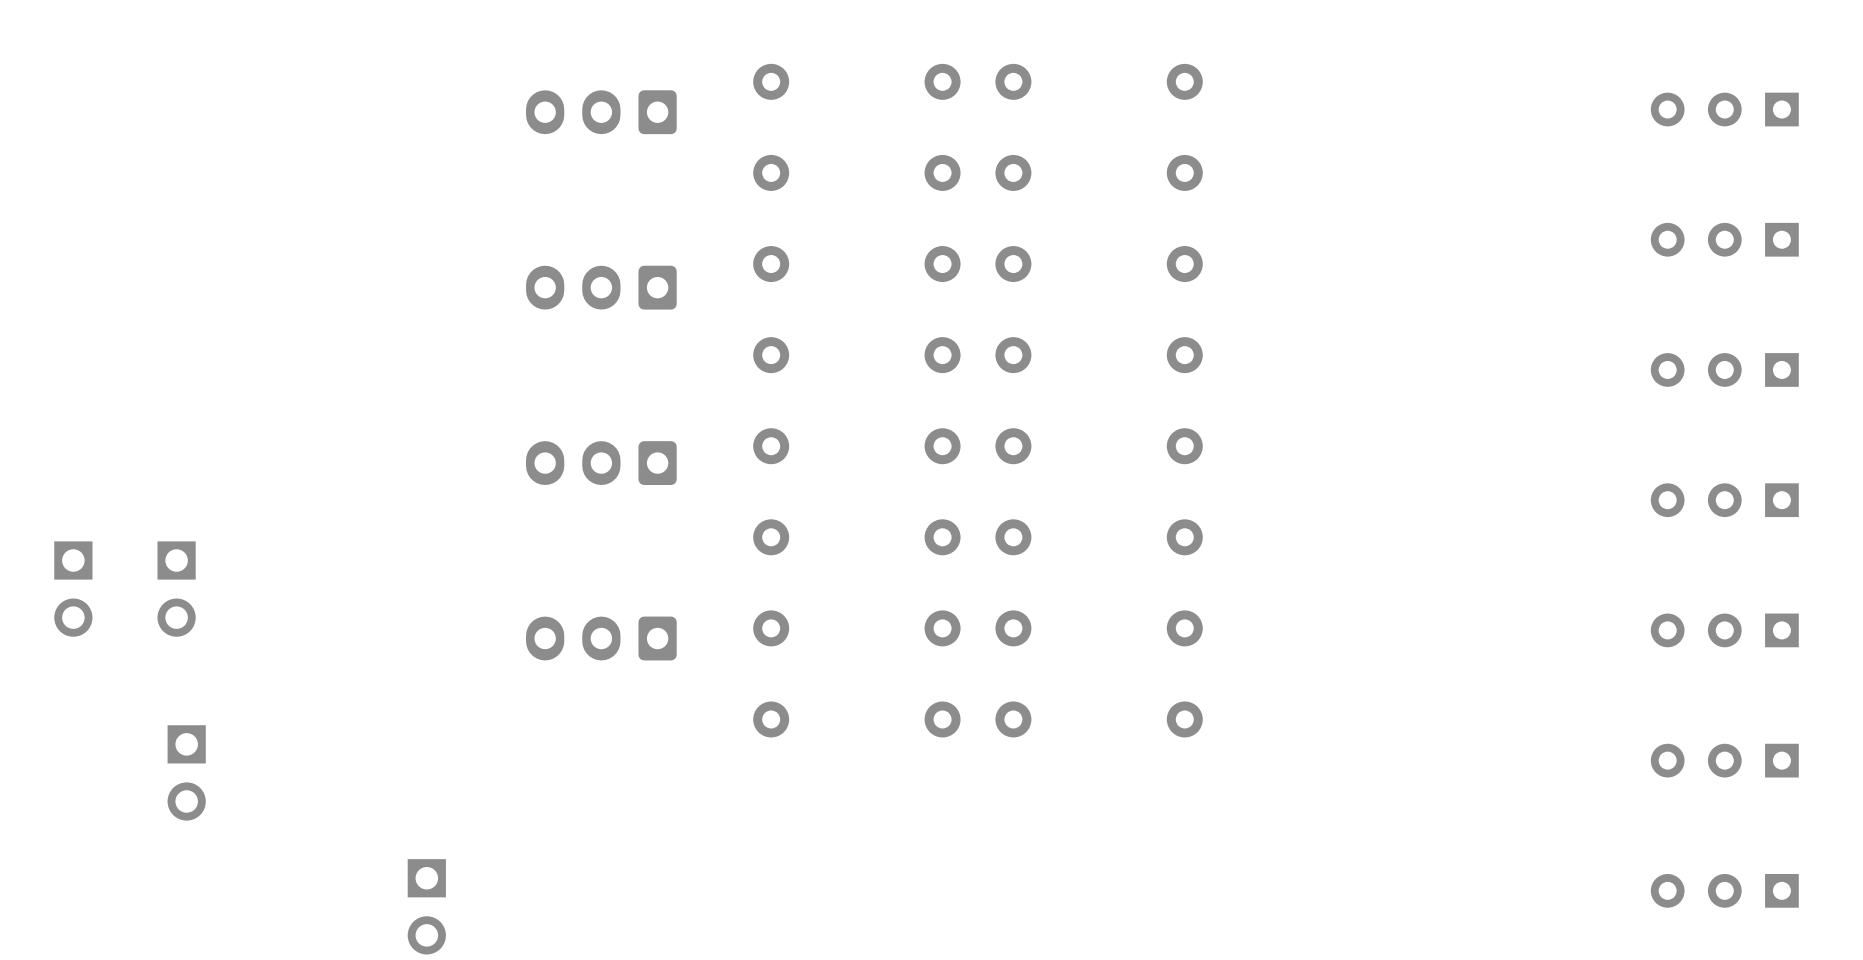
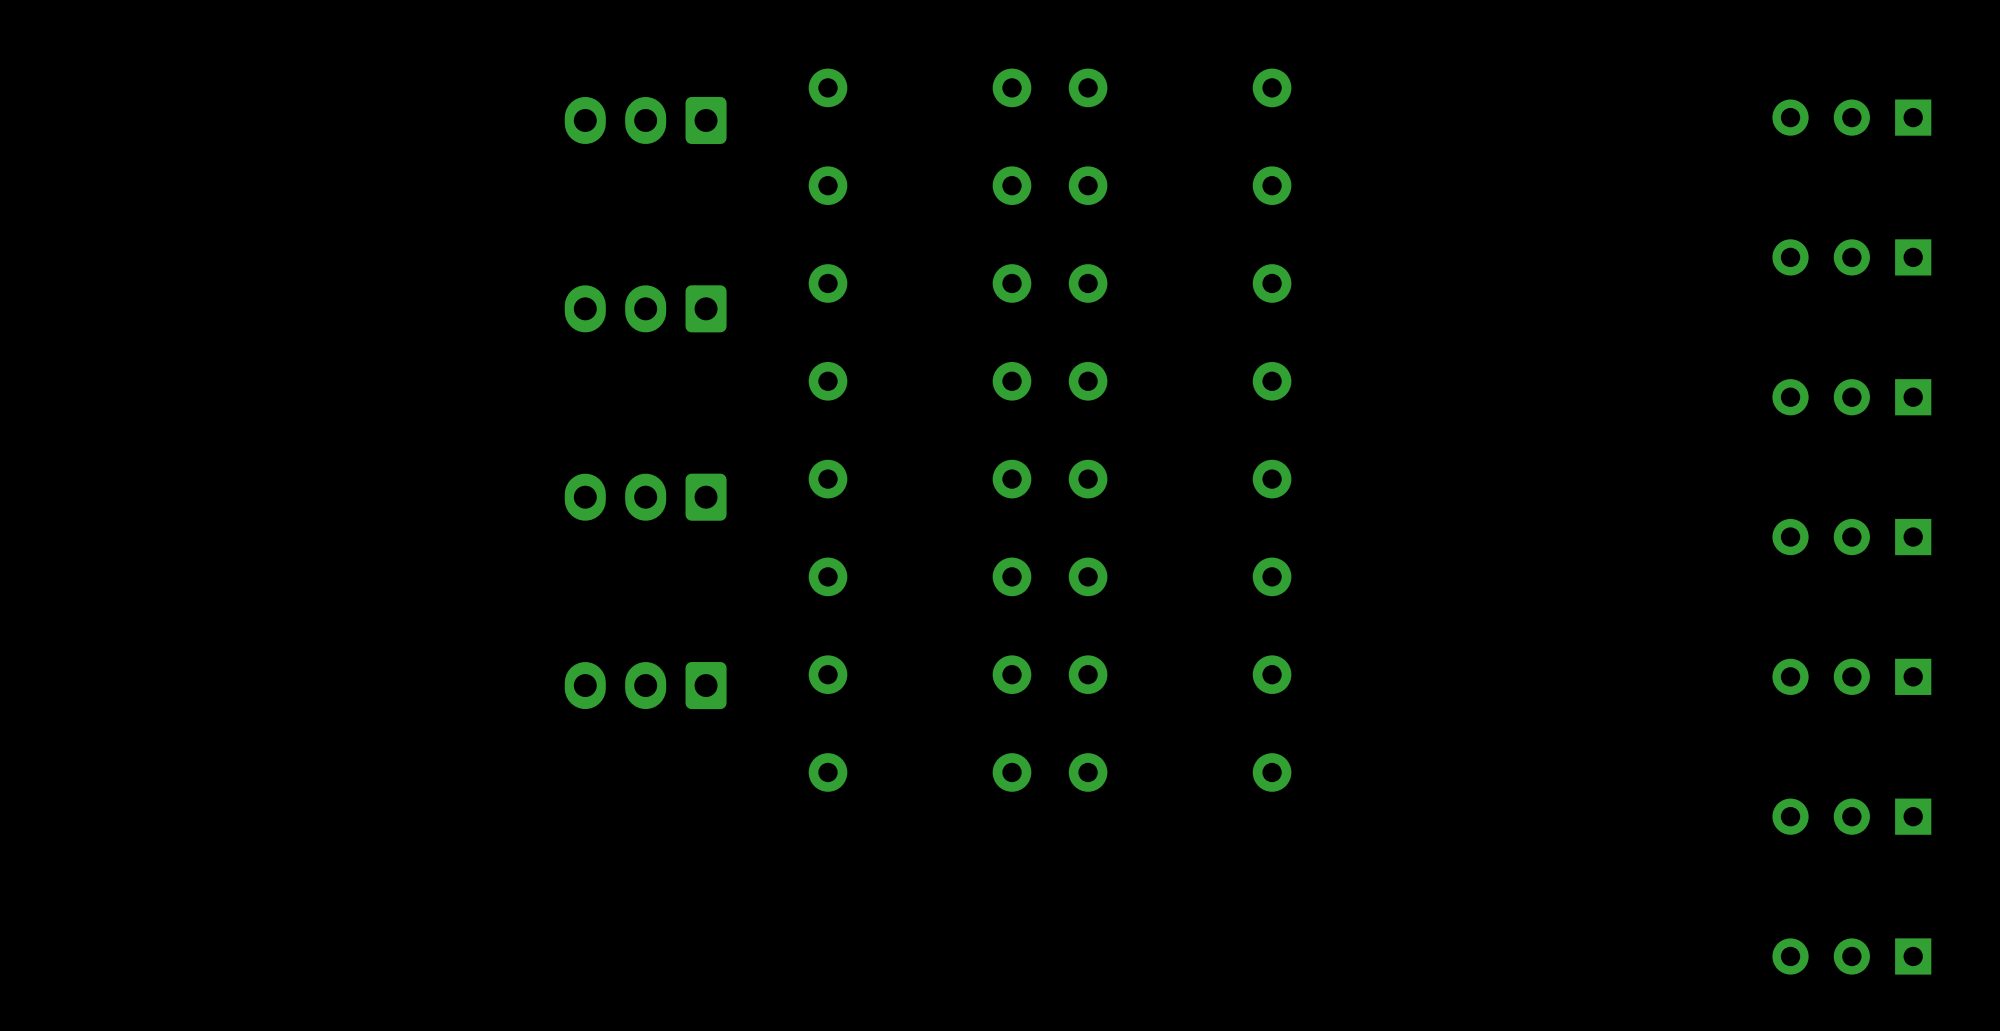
part: (73, 589) -> none
part: (176, 589) -> none
part: (186, 772) -> none
part: (426, 906) -> none

